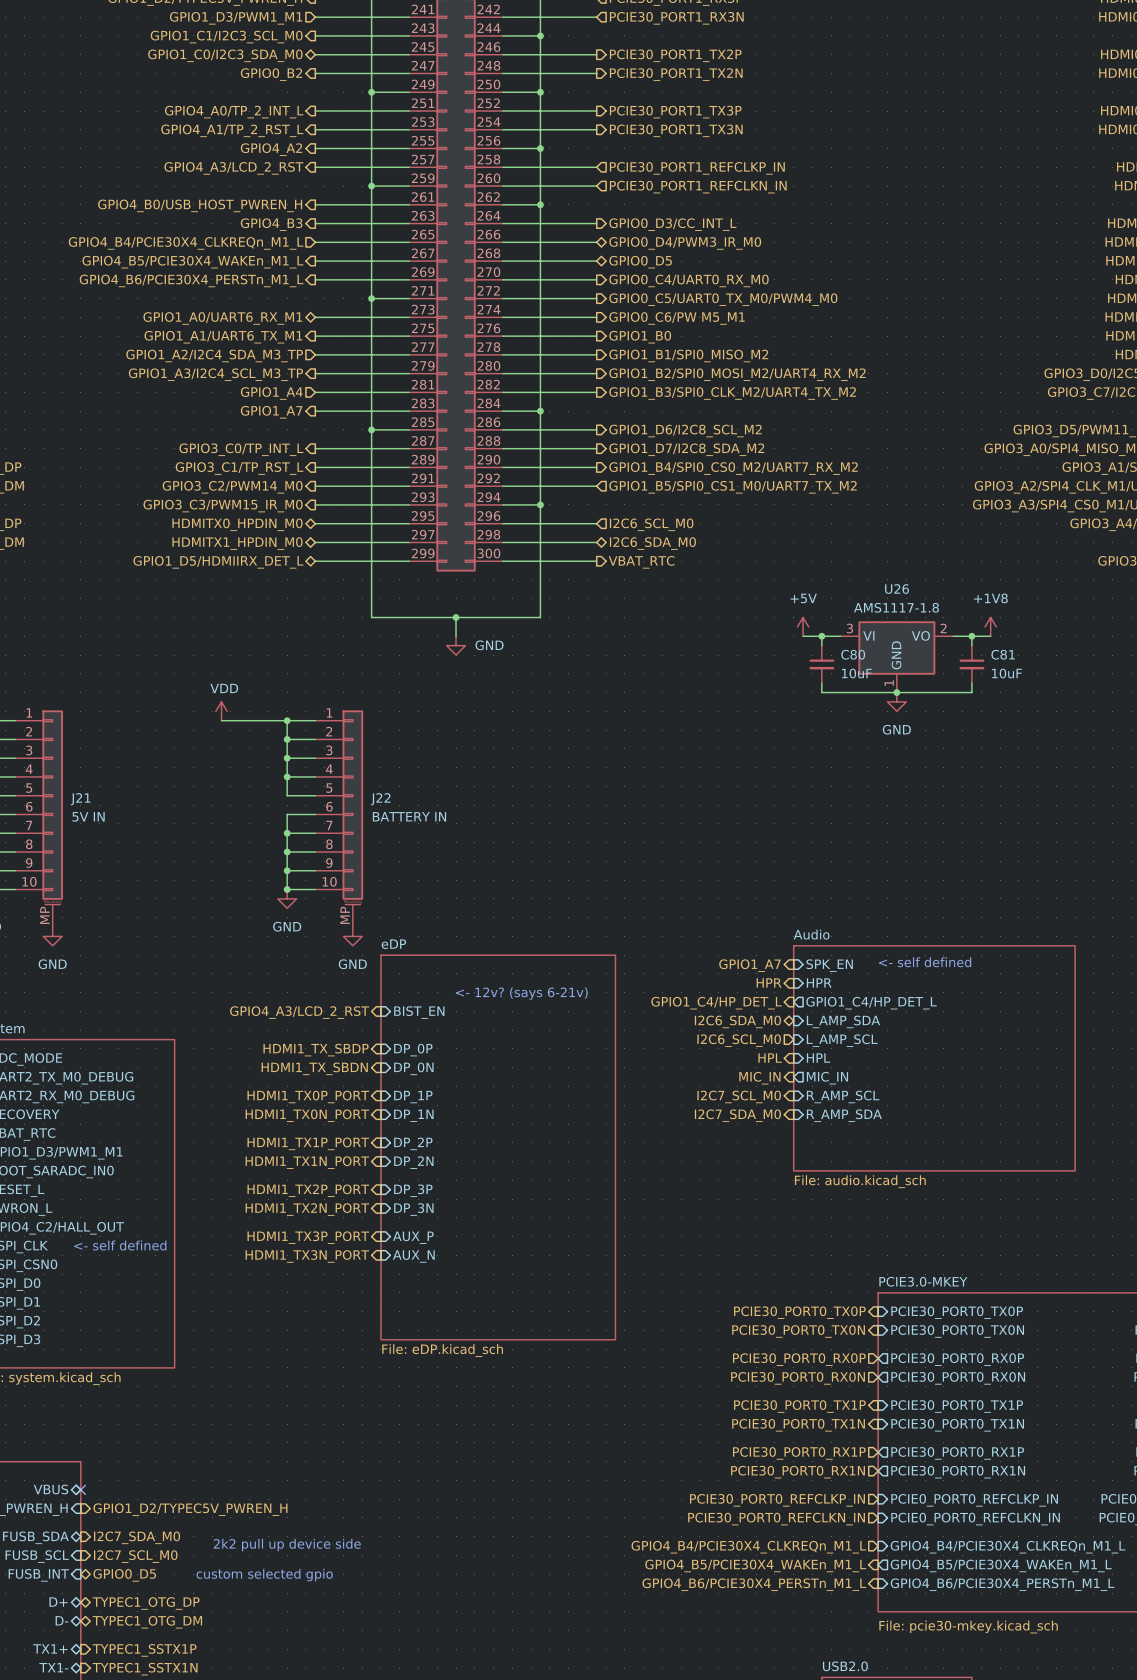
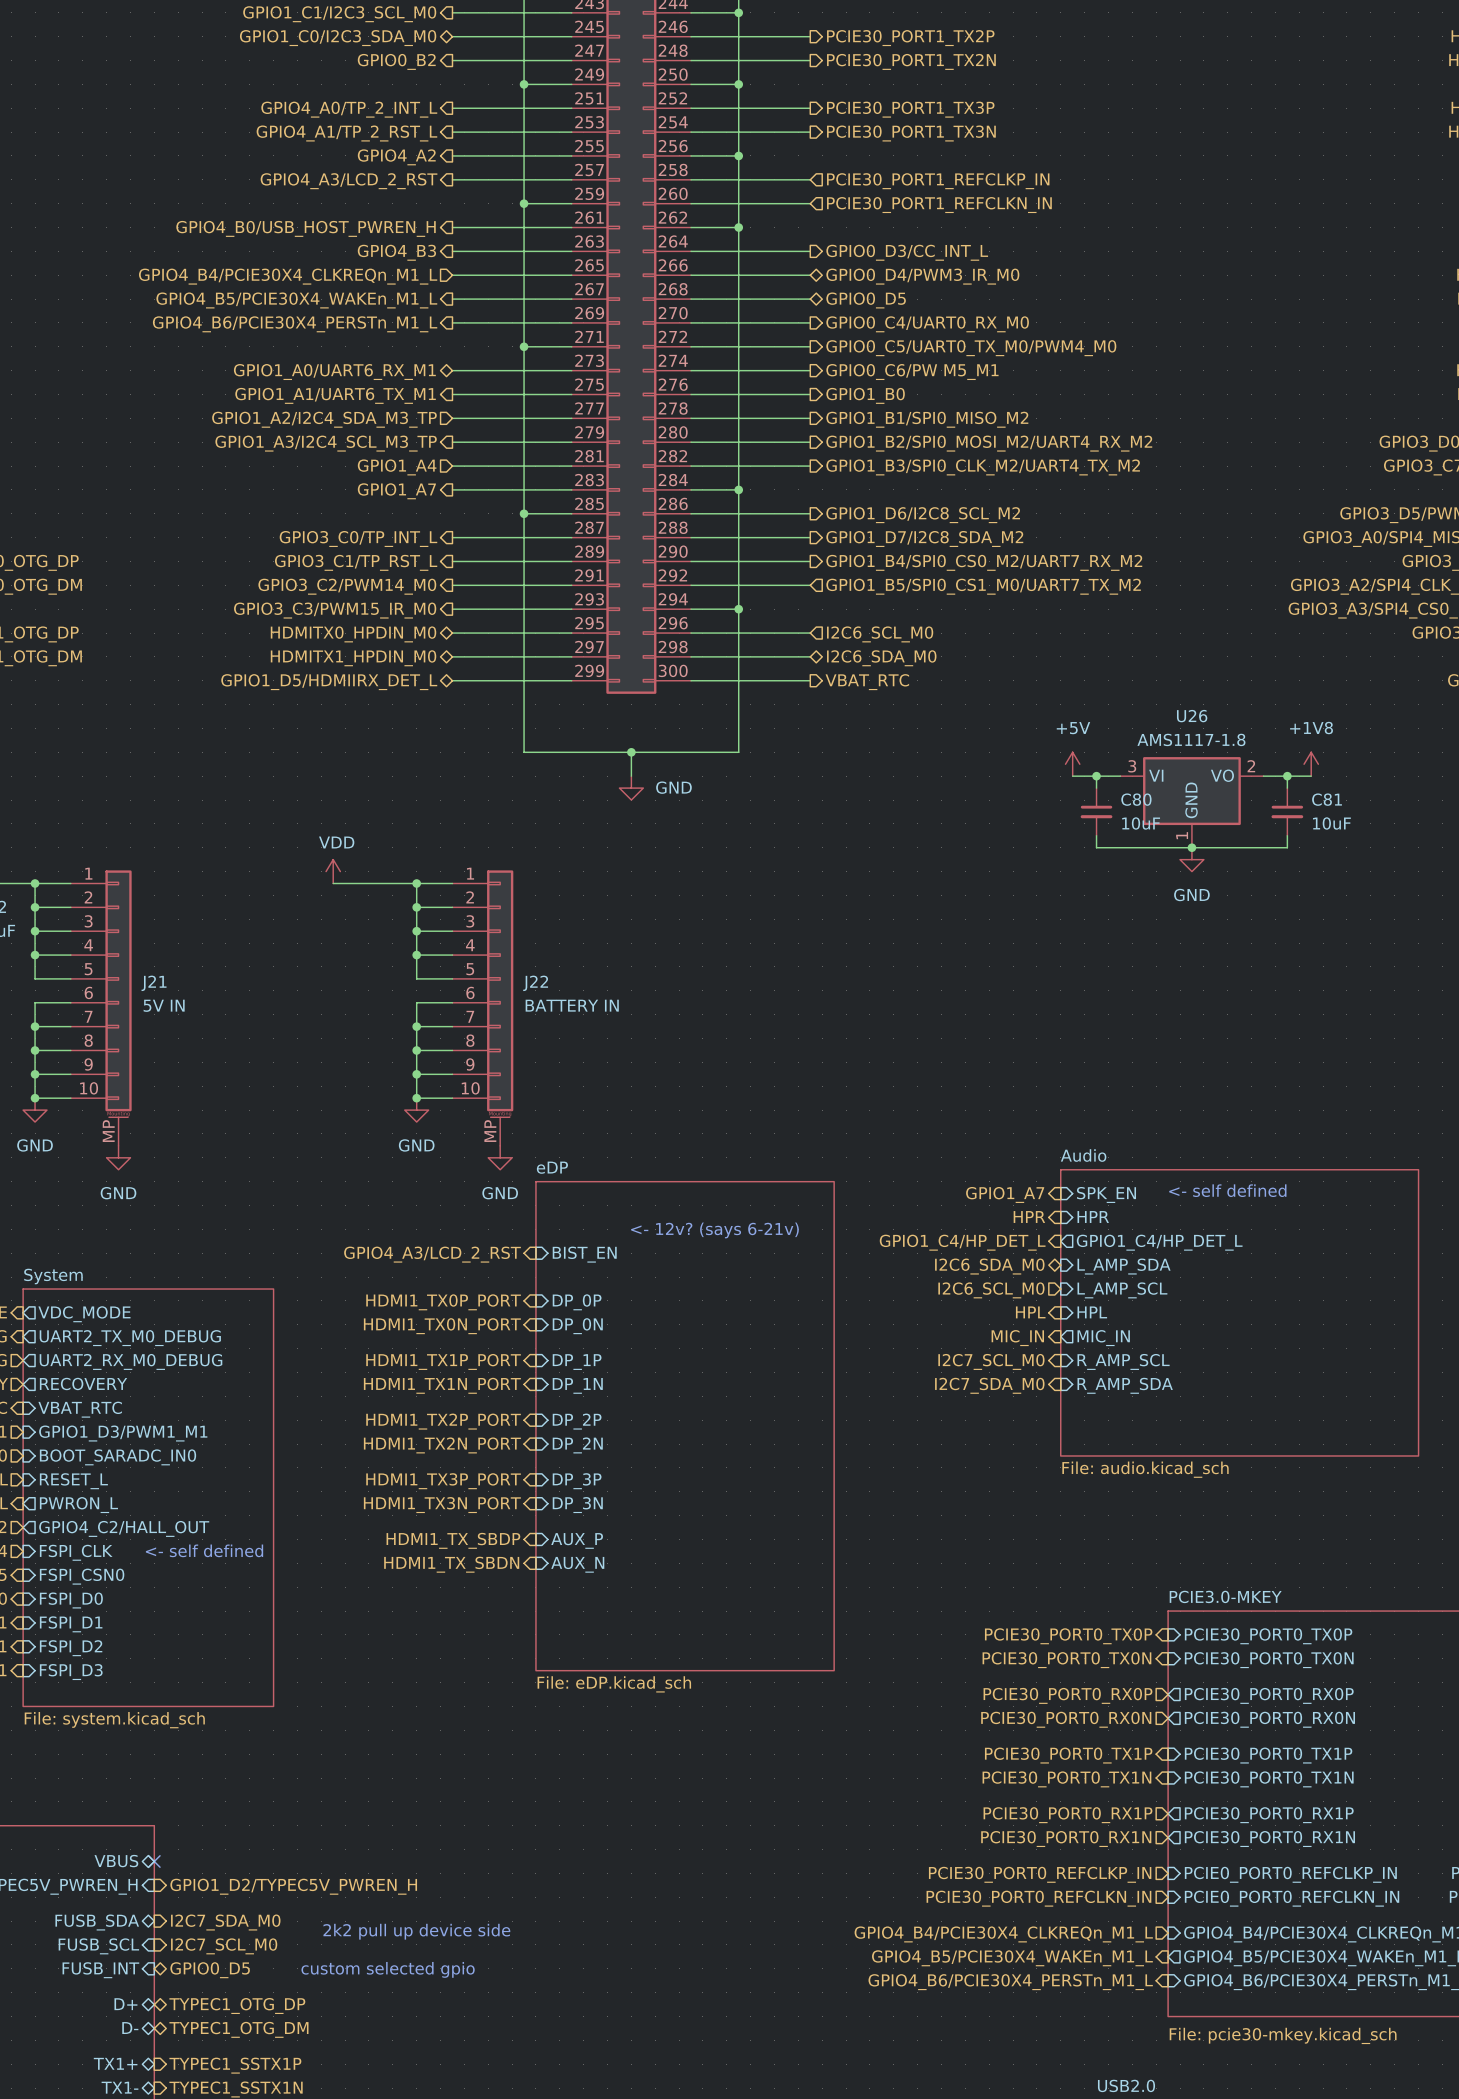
hierarchical label: HDMI1_TX_SBDP (316, 1050) -> HDMI1_TX0P_PORT (443, 1302)
hierarchical label: HDMI1_TX_SBDN (314, 1068) -> HDMI1_TX0N_PORT (442, 1326)
hierarchical label: HDMI1_TX0P_PORT (308, 1096) -> HDMI1_TX1P_PORT (443, 1361)
hierarchical label: HDMI1_TX0N_PORT (307, 1115) -> HDMI1_TX1N_PORT (442, 1385)
hierarchical label: HDMI1_TX1P_PORT (308, 1143) -> HDMI1_TX2P_PORT (443, 1421)
hierarchical label: HDMI1_TX1N_PORT (307, 1162) -> HDMI1_TX2N_PORT (442, 1445)
hierarchical label: HDMI1_TX2P_PORT (308, 1190) -> HDMI1_TX3P_PORT (443, 1481)
hierarchical label: HDMI1_TX2N_PORT (307, 1209) -> HDMI1_TX3N_PORT (442, 1505)
hierarchical label: HDMI1_TX3P_PORT (308, 1237) -> HDMI1_TX_SBDP (453, 1540)
hierarchical label: HDMI1_TX3N_PORT (307, 1256) -> HDMI1_TX_SBDN (451, 1564)

